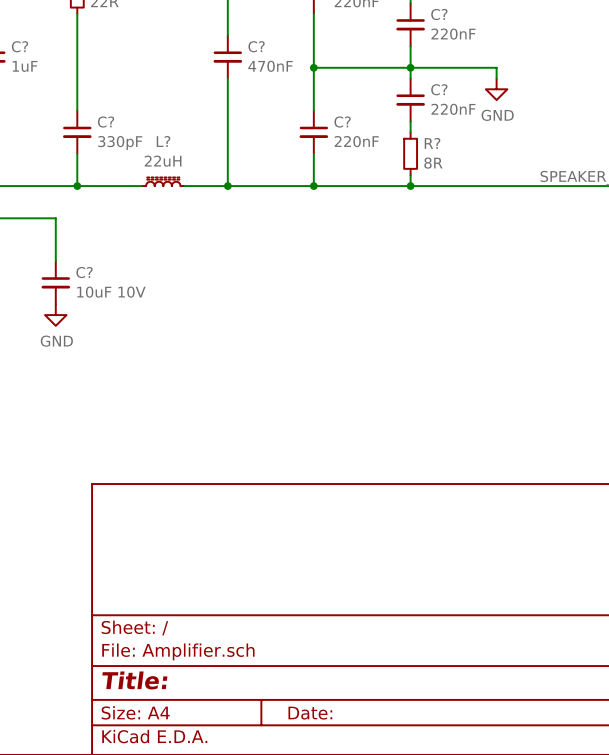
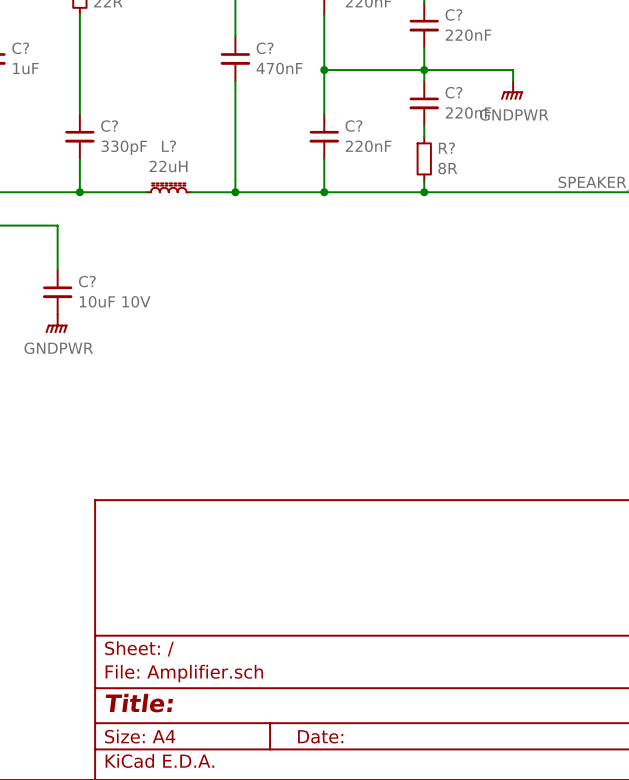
power symbol: GND (496, 89) -> GNDPWR (512, 90)
power symbol: GND (55, 315) -> GNDPWR (56, 323)

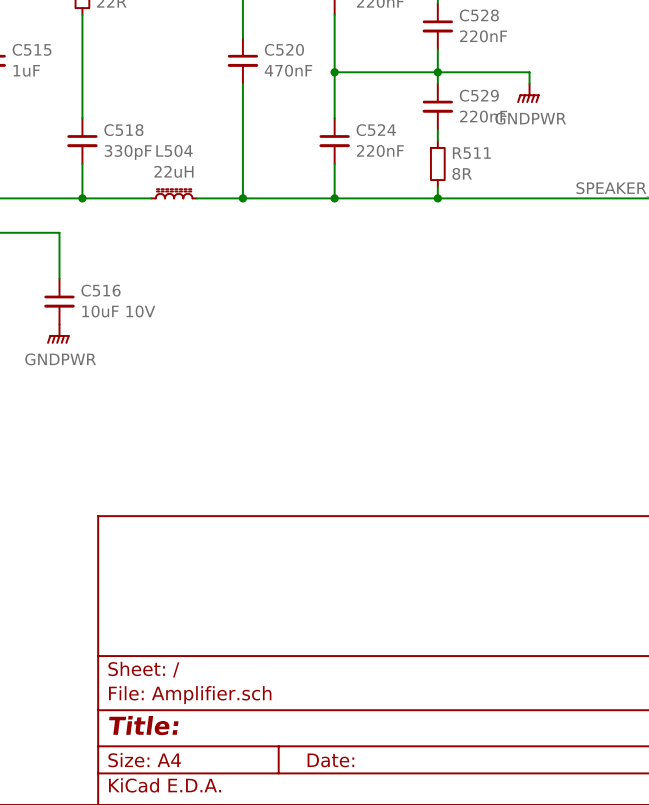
C? name: C? (453, 14) -> C528 (479, 15)
C? name: C? (20, 48) -> C515 (32, 49)
C? name: C? (265, 48) -> C520 (284, 49)
C? name: C? (453, 92) -> C529 (479, 95)
C? name: C? (109, 126) -> C518 (123, 130)
C? name: C? (353, 126) -> C524 (376, 130)
L? name: L? (168, 146) -> L504 (174, 150)
R? name: R? (446, 148) -> R511 (471, 153)
C? name: C? (87, 281) -> C516 (101, 290)

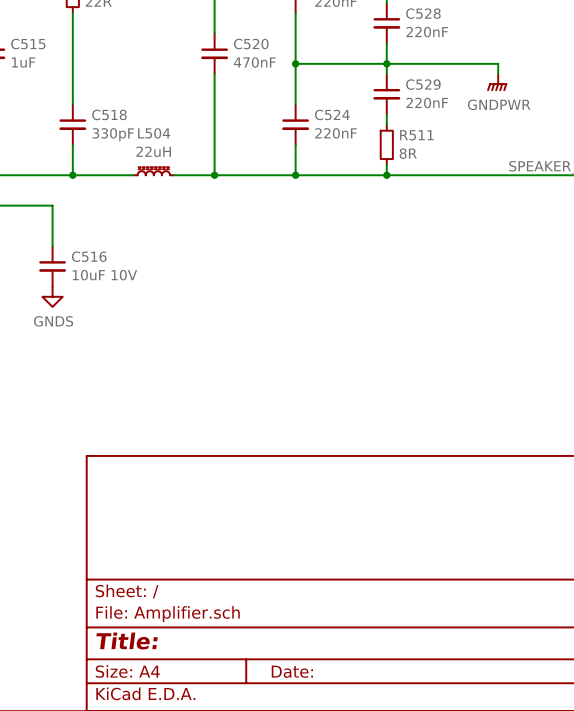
wire: (529, 72) (529, 83) -> (467, 63) (498, 63) (498, 73)
power symbol position: GNDPWR (528, 93) -> GNDPWR (497, 82)
power symbol: GNDPWR (58, 334) -> GNDS (52, 296)

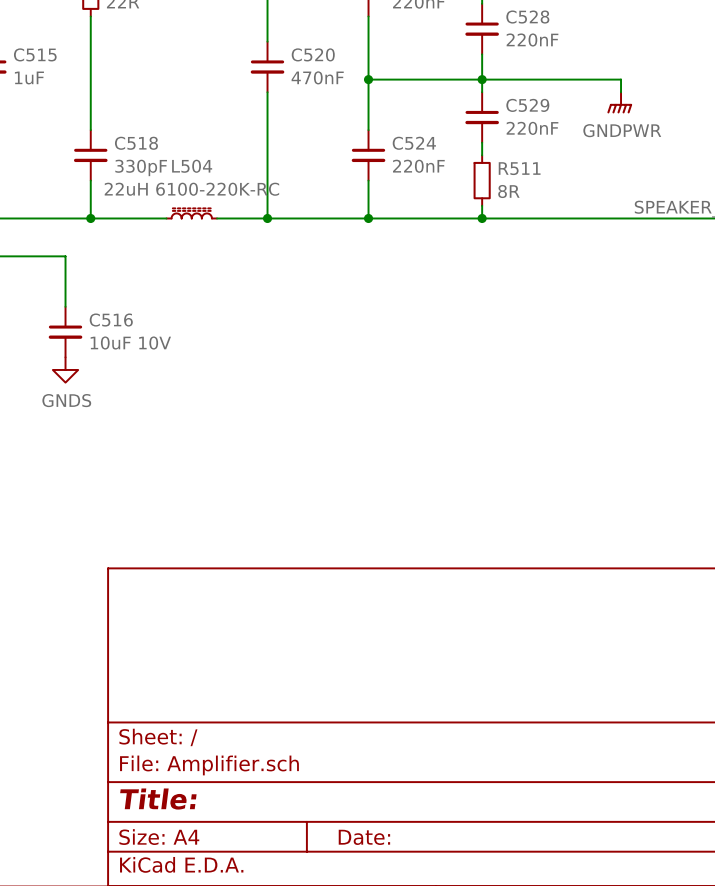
L504 value: 22uH (153, 151) -> 22uH 6100-220K-RC (191, 189)

